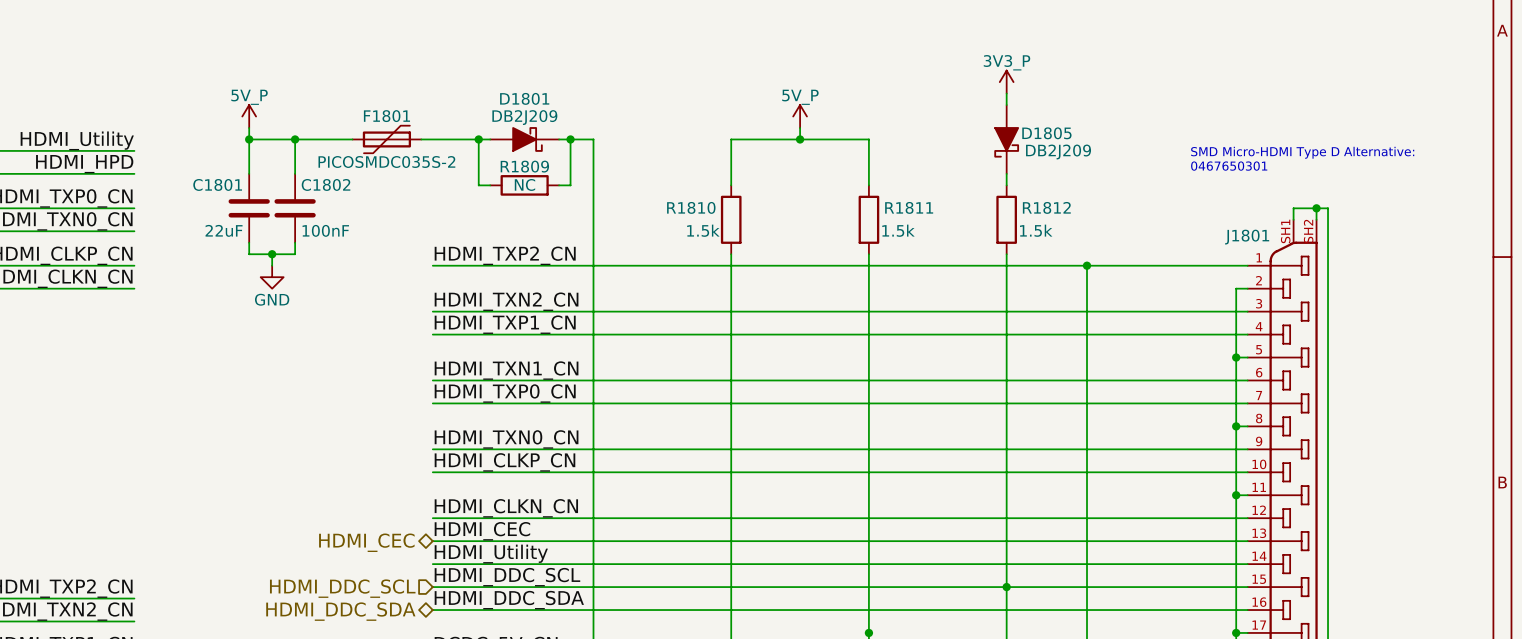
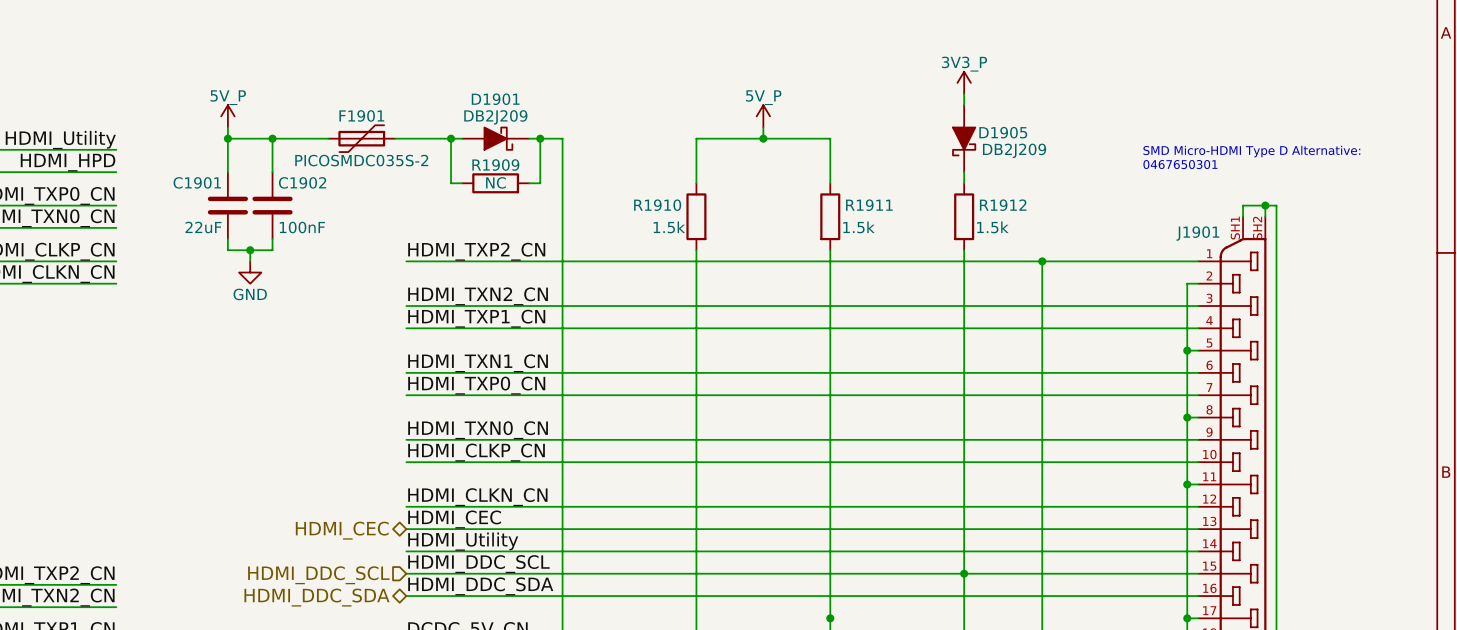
D1801 name: D1801 (524, 98) -> D1901 (495, 99)
F1801 name: F1801 (386, 116) -> F1901 (361, 115)
D1805 name: D1805 (1046, 133) -> D1905 (1003, 132)
R1809 name: R1809 (524, 166) -> R1909 (495, 165)
C1801 name: C1801 (217, 184) -> C1901 (197, 182)
C1802 name: C1802 (326, 184) -> C1902 (302, 182)
R1810 name: R1810 (691, 207) -> R1910 (657, 205)
R1811 name: R1811 (909, 207) -> R1911 (869, 205)
R1812 name: R1812 (1046, 207) -> R1912 (1003, 205)
J1801 name: J1801 (1247, 237) -> J1901 (1197, 233)

